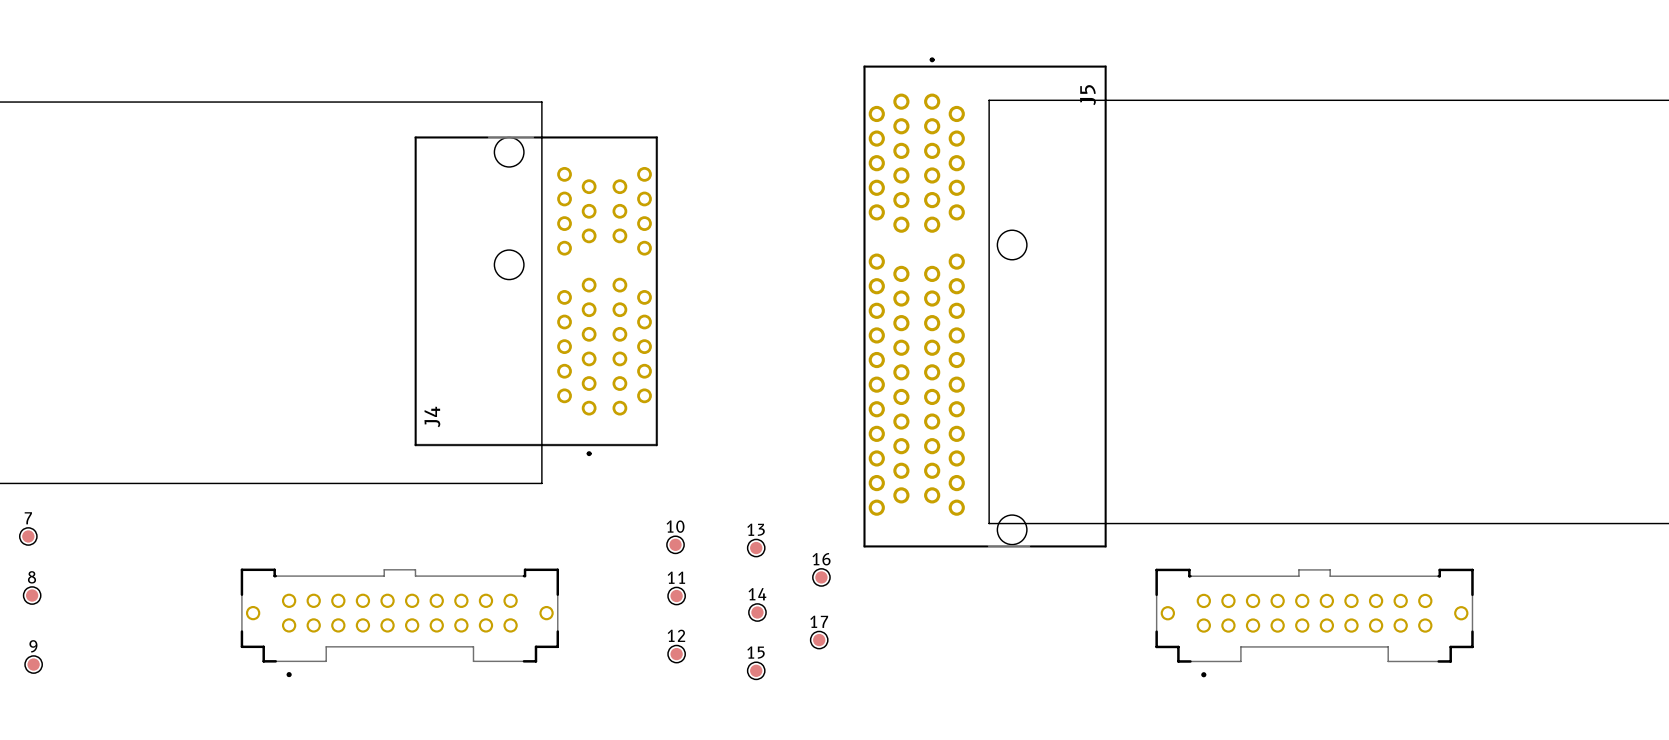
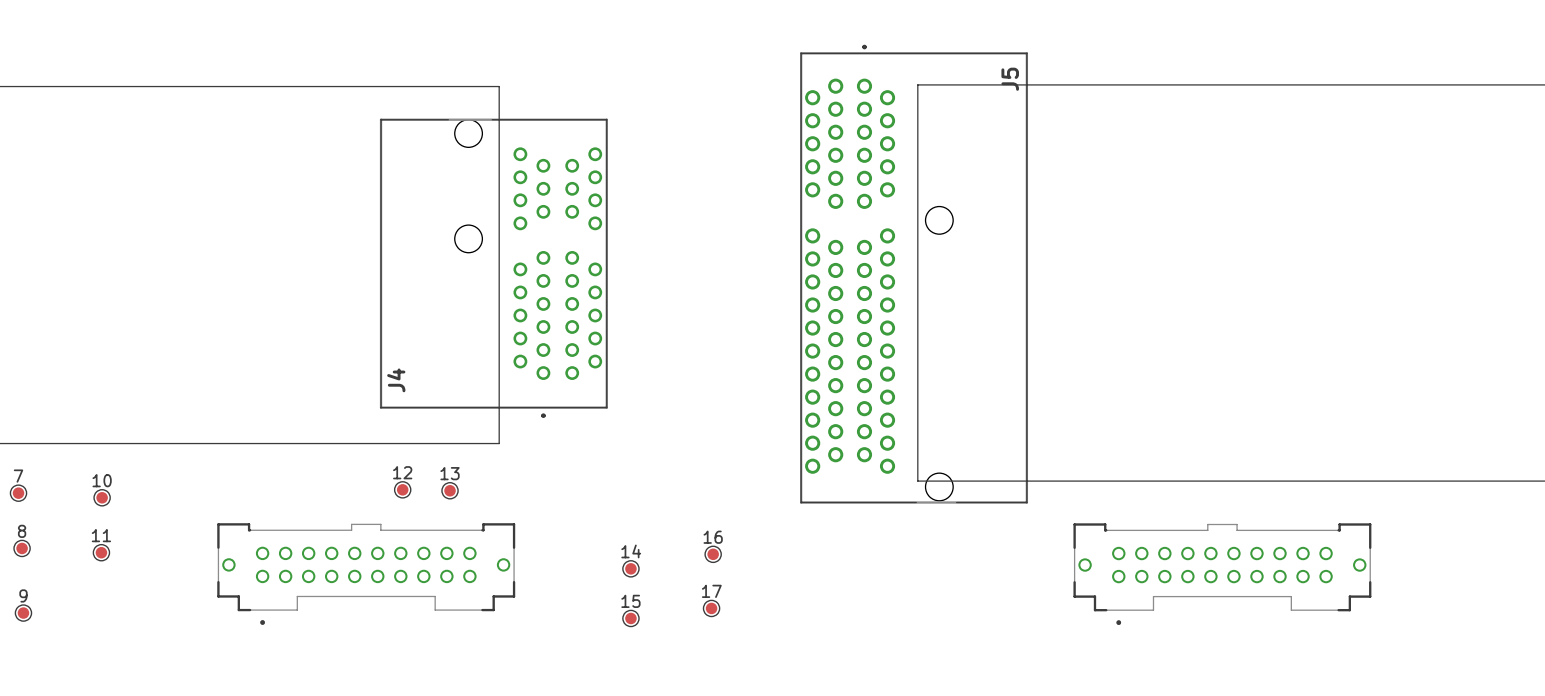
10 position: (675, 544) -> (102, 497)
13 position: (756, 548) -> (450, 490)
16 position: (821, 577) -> (713, 554)
11 position: (676, 596) -> (101, 552)
14 position: (757, 612) -> (630, 568)
17 position: (819, 640) -> (711, 608)
12 position: (676, 654) -> (402, 489)
15 position: (756, 670) -> (630, 618)

